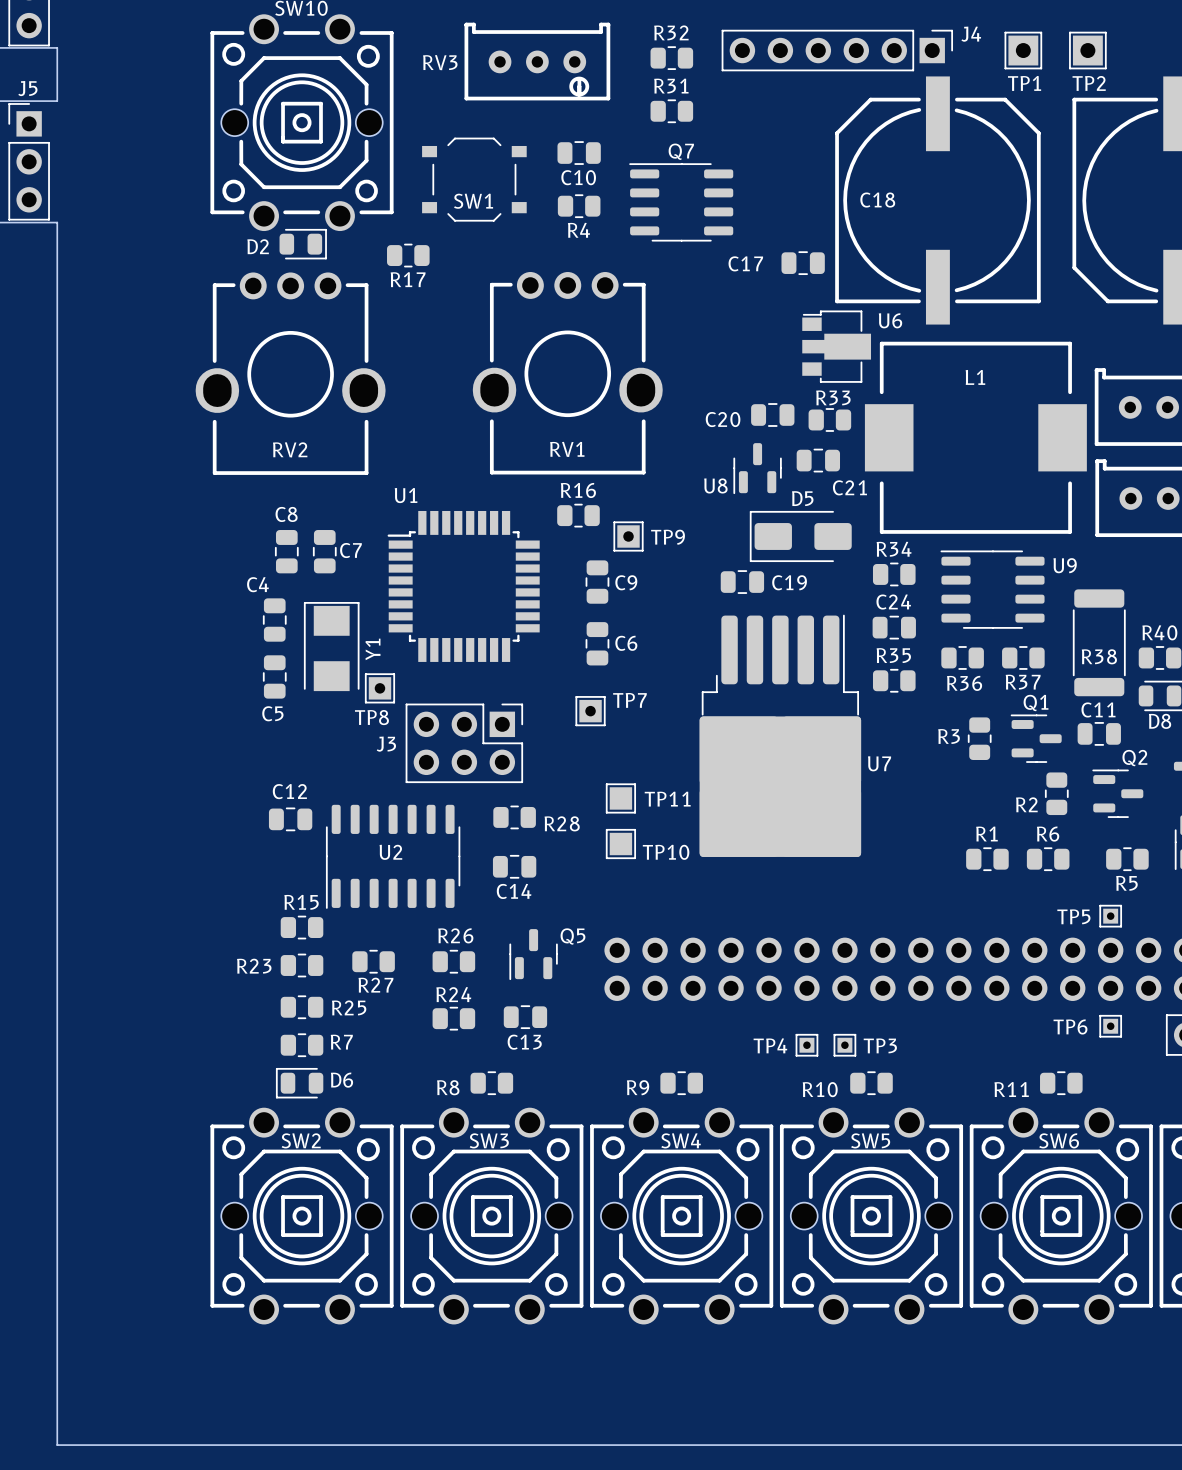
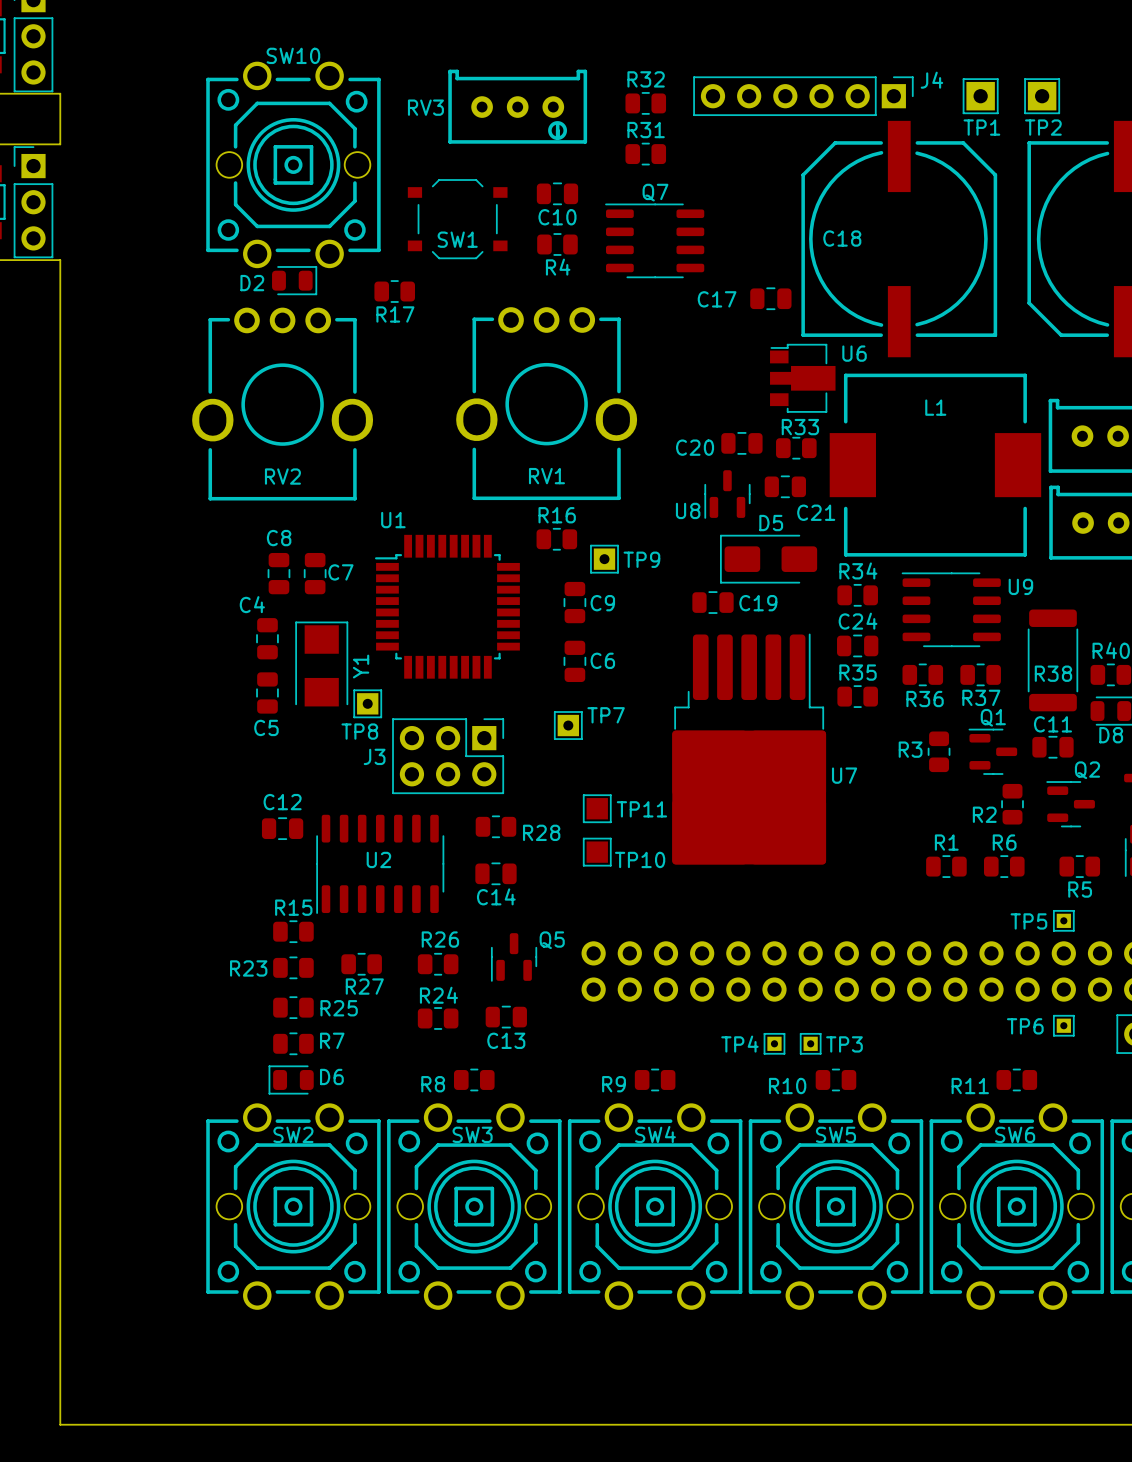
J5 name: J5 (27, 88) -> none

